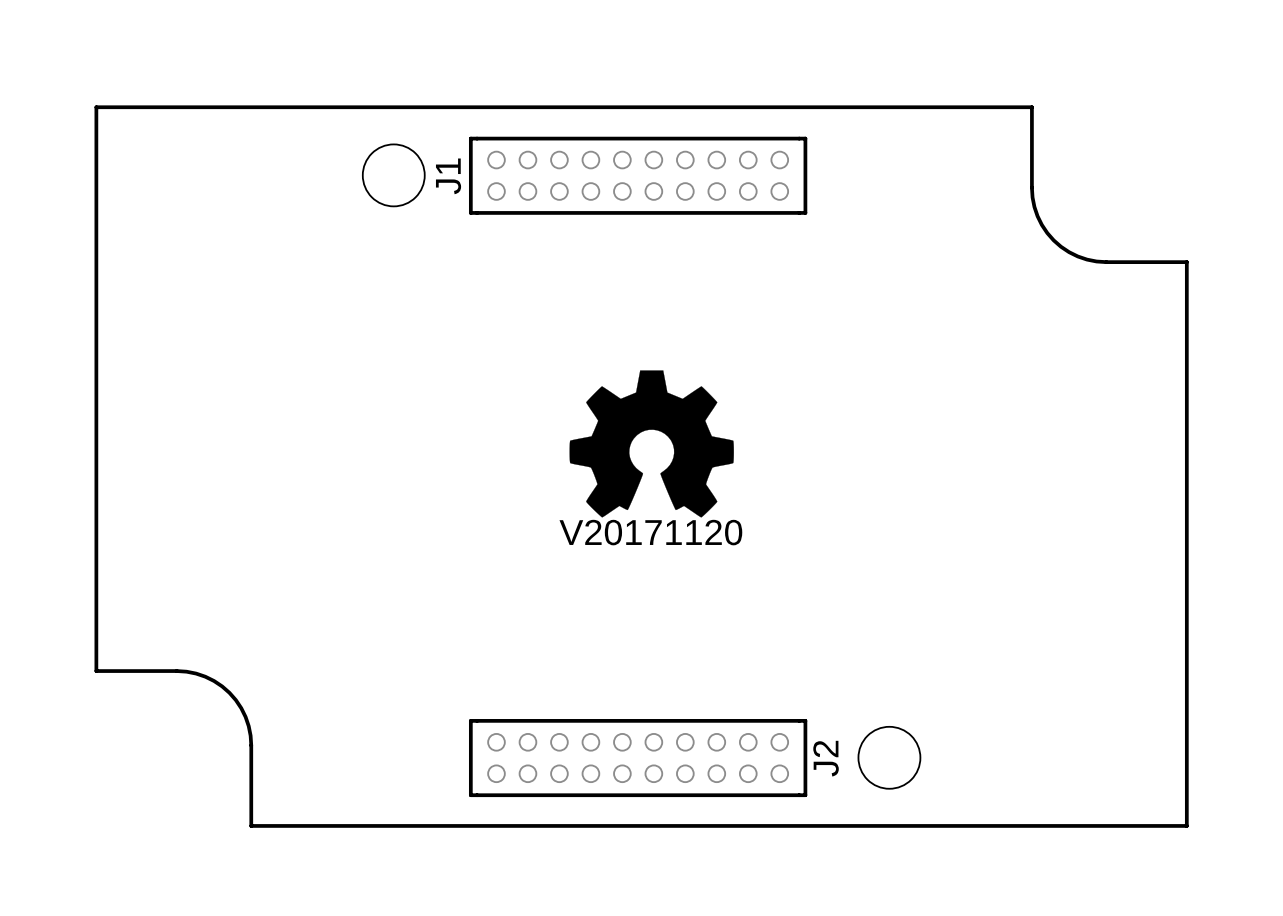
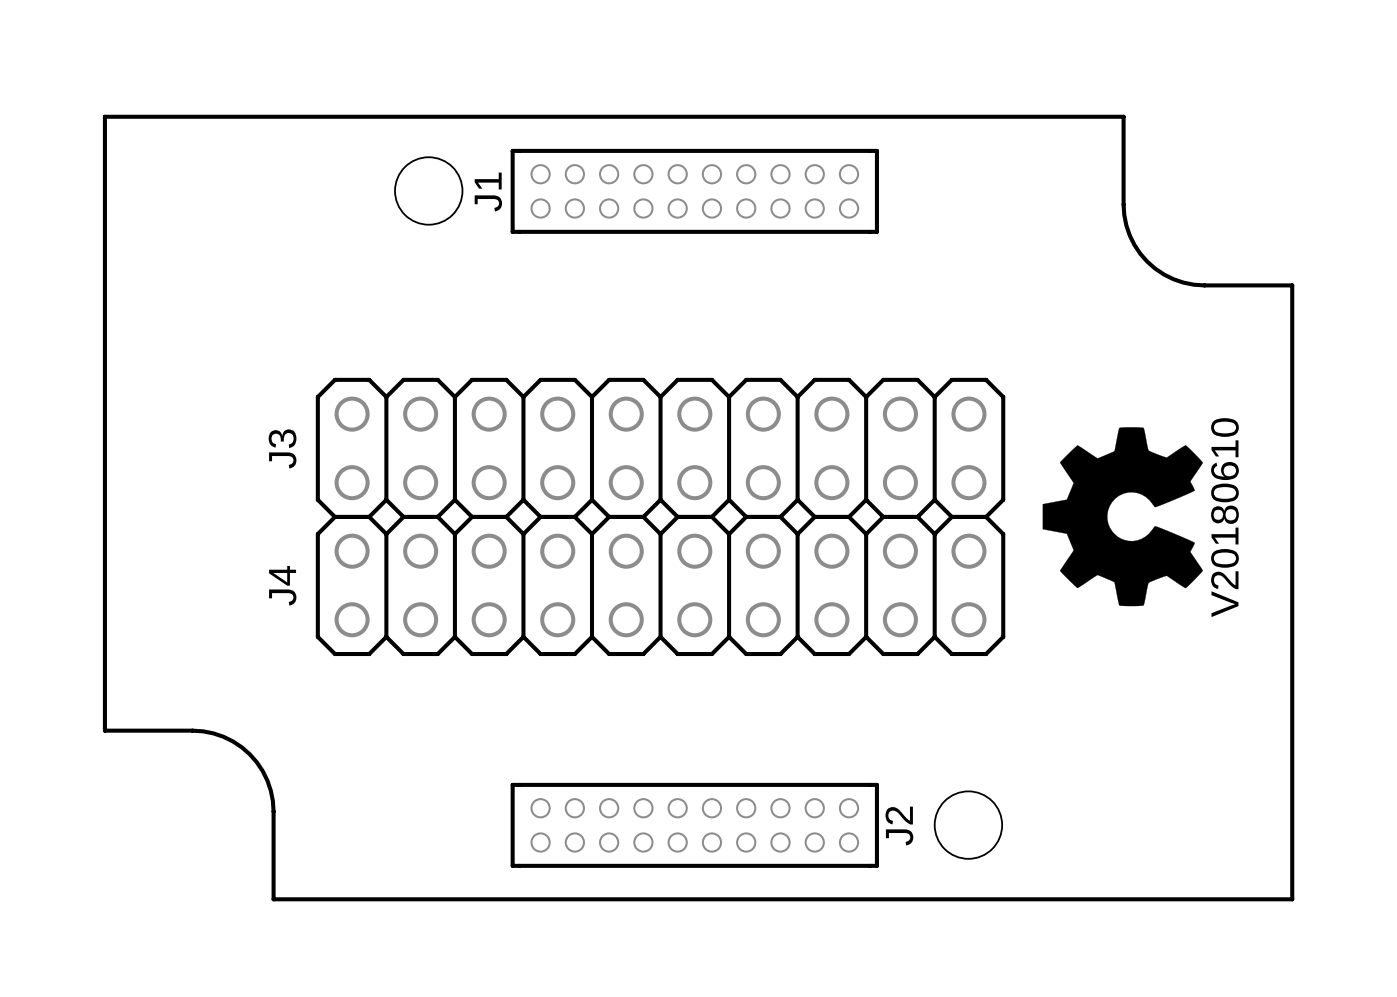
drawing: [569, 370, 734, 518] -> none
drawing: none -> [1042, 427, 1203, 607]
J3: none -> (660, 448)
J4: none -> (660, 585)

